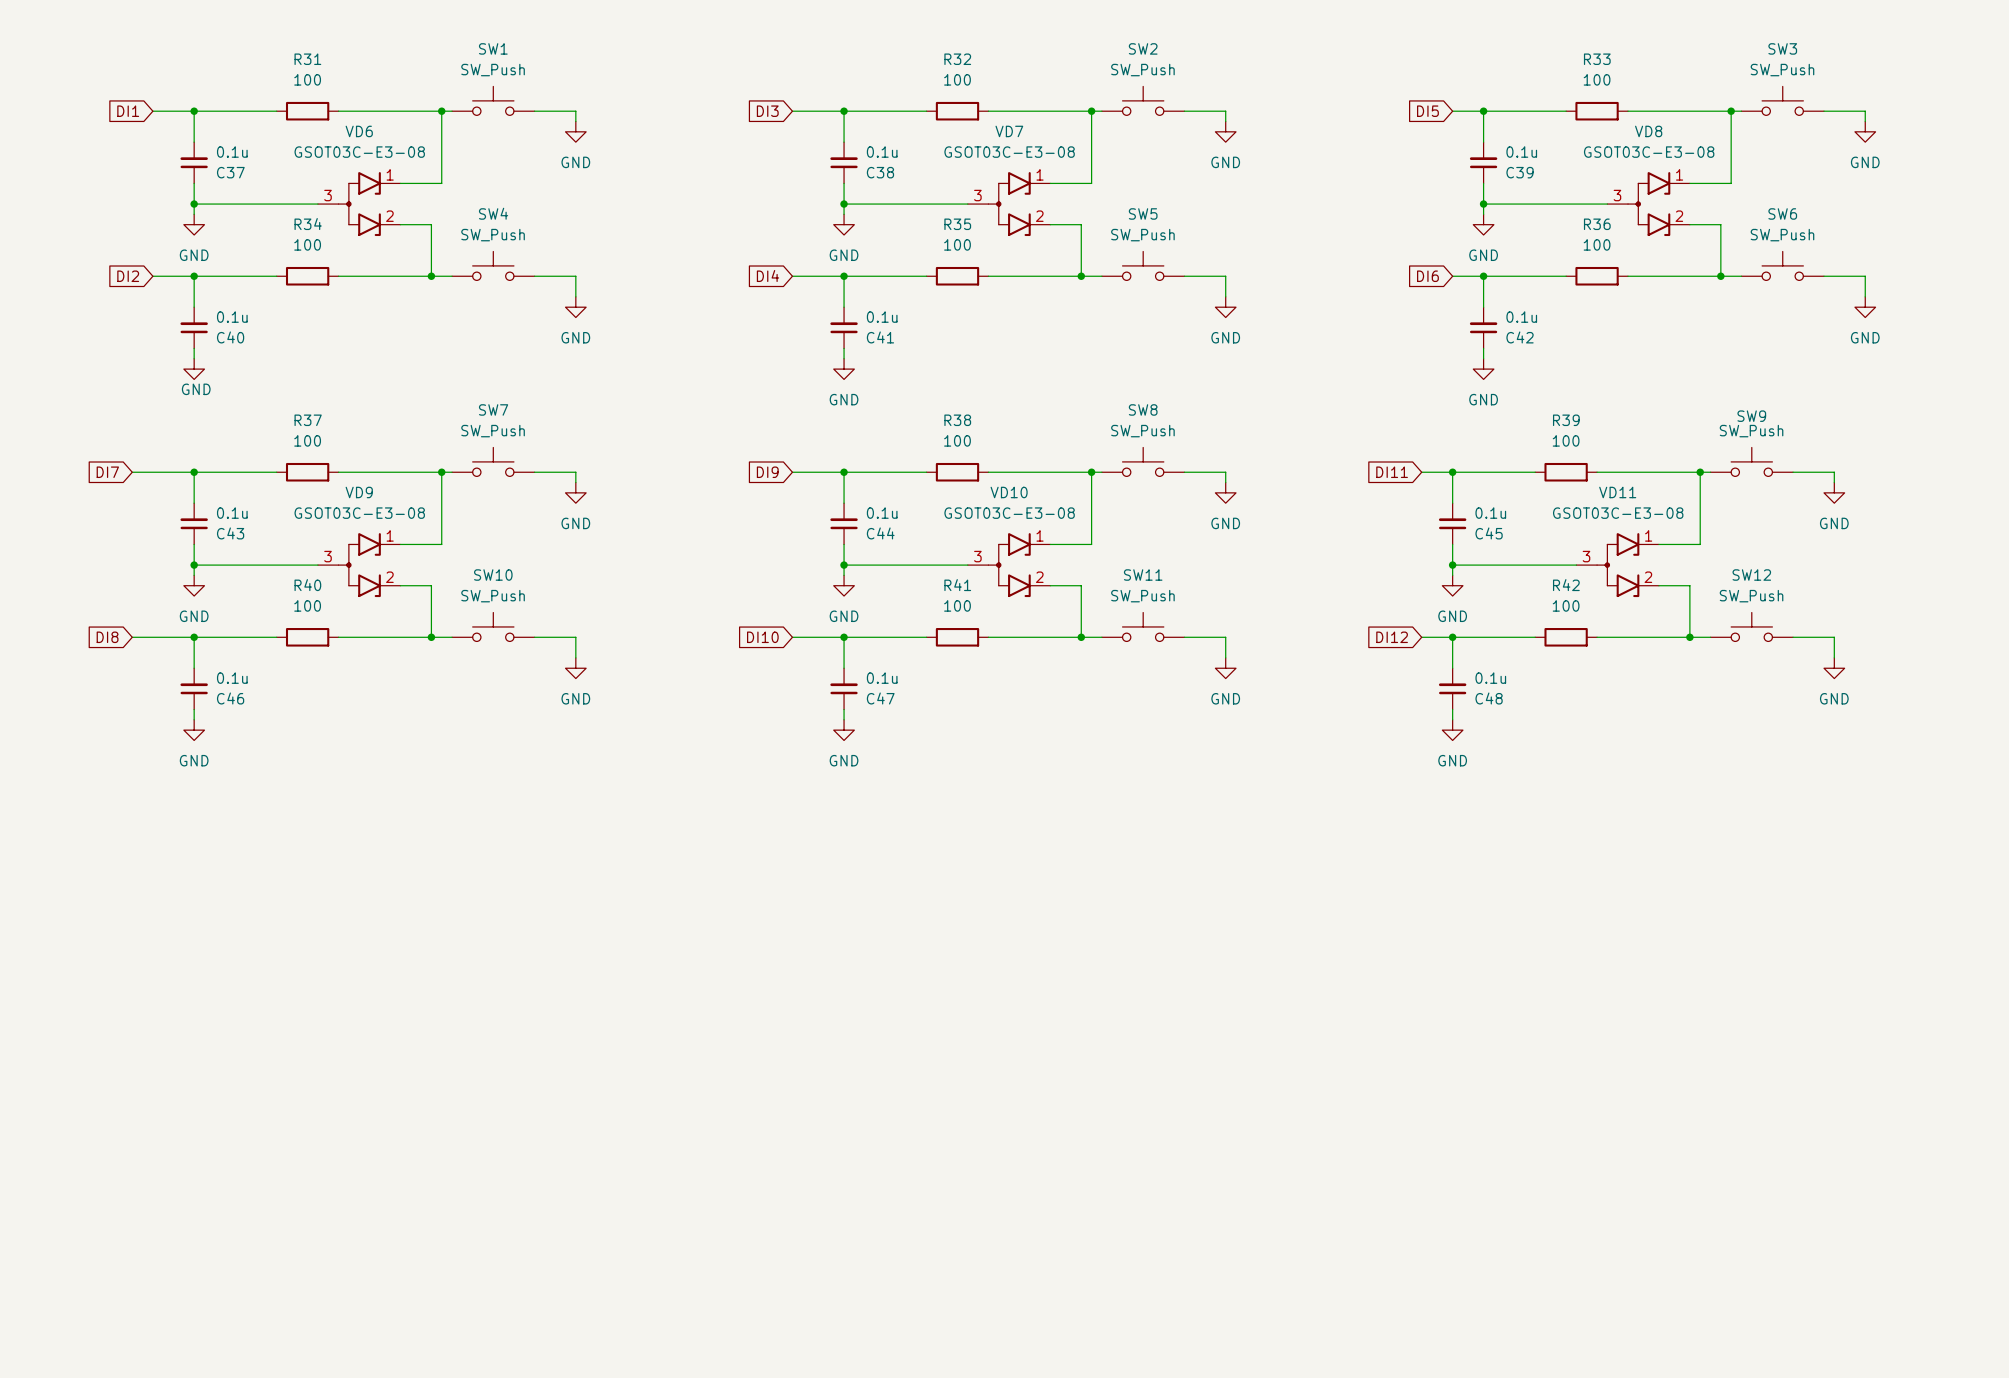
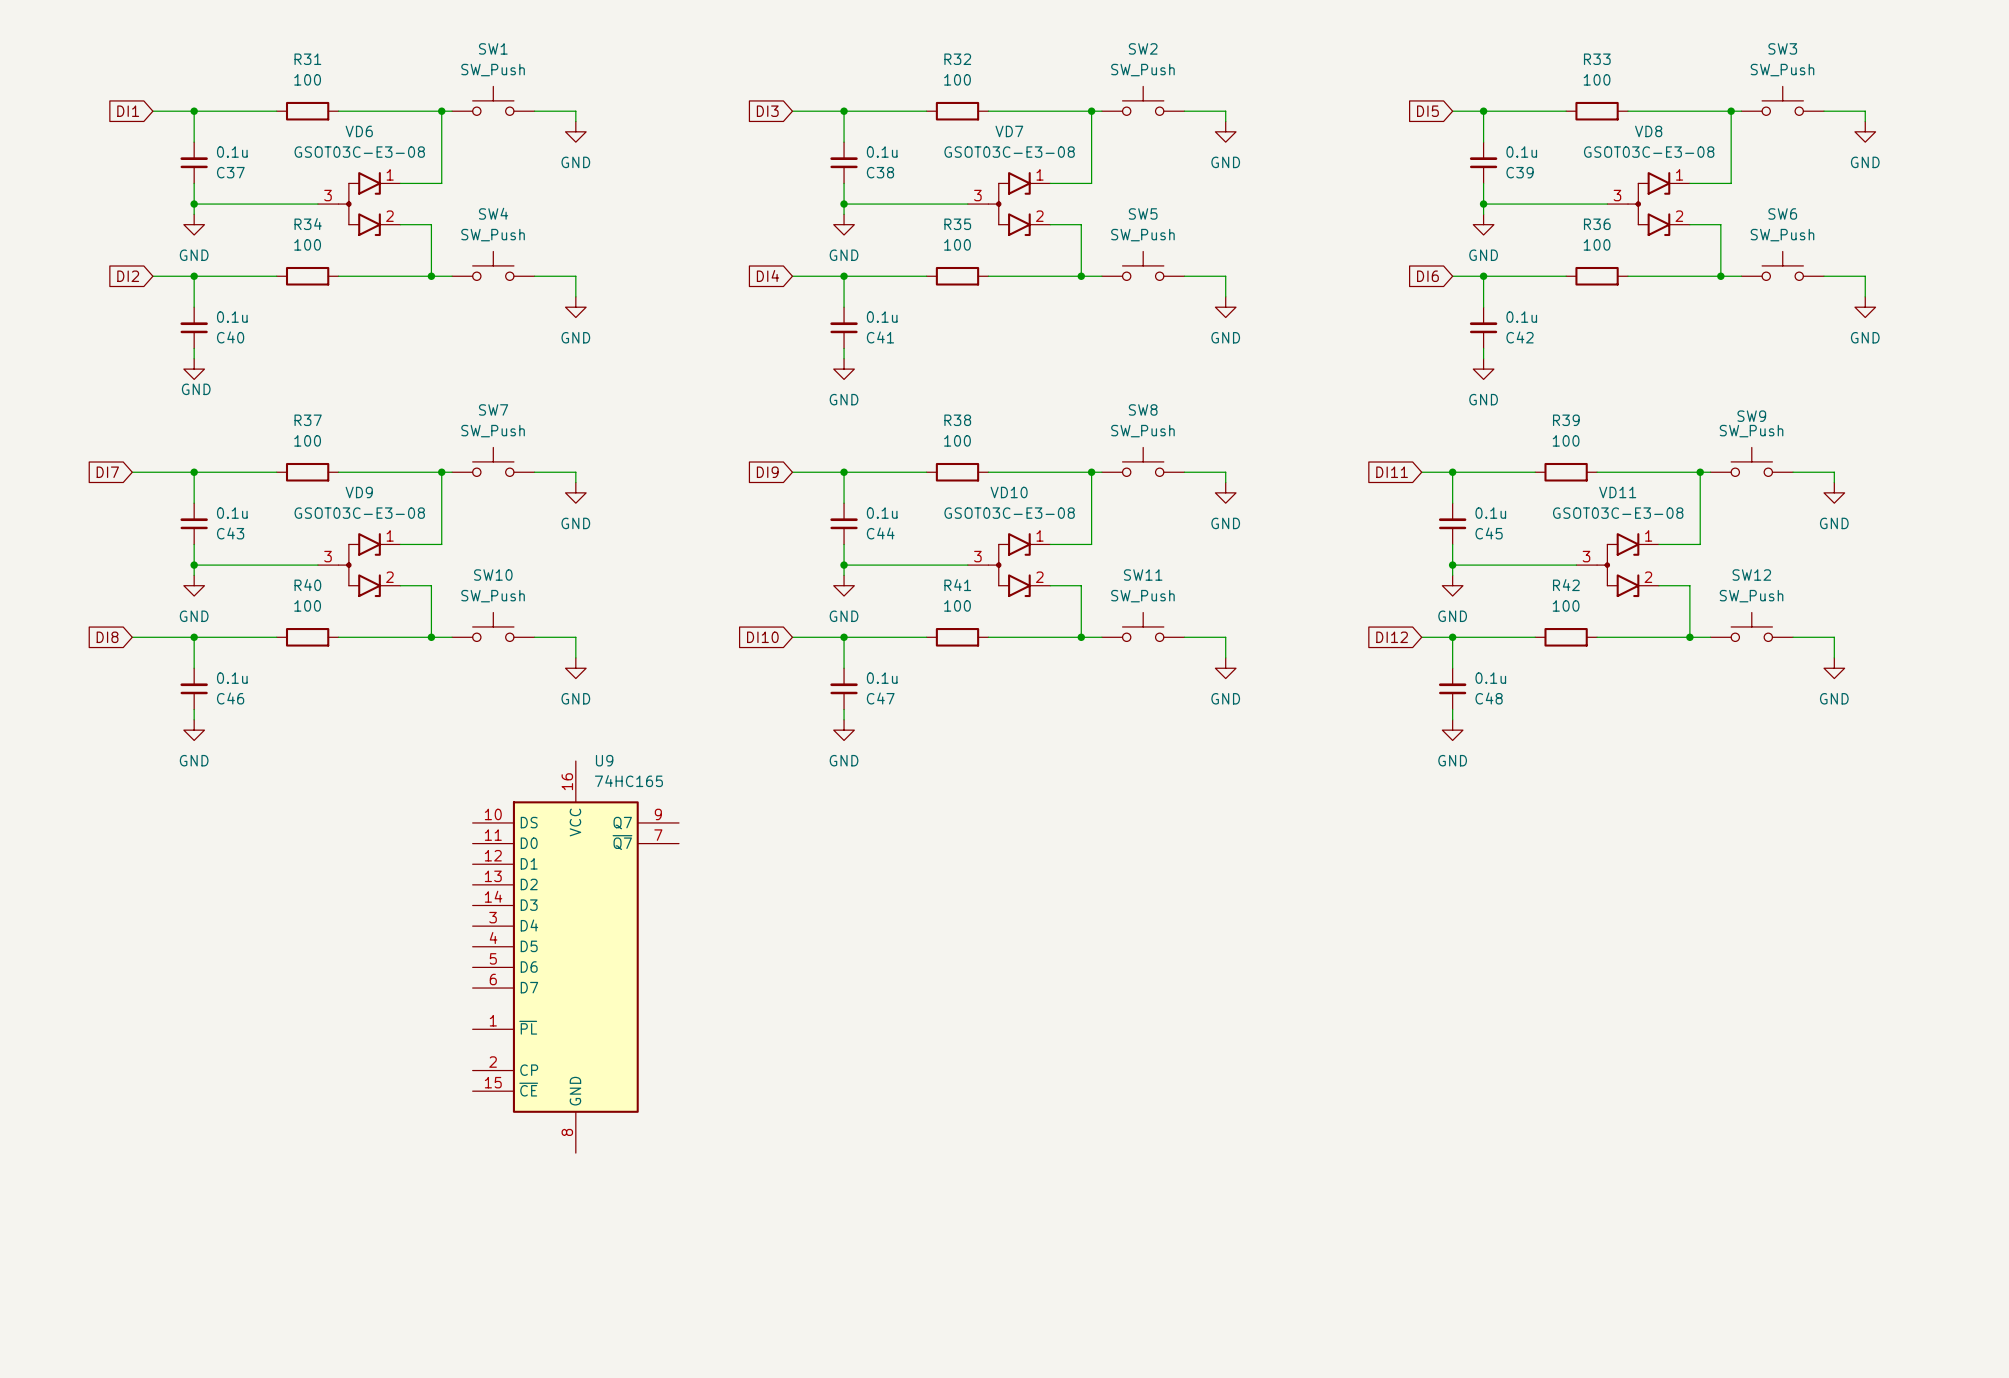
U9: none -> 74HC165 (575, 957)

